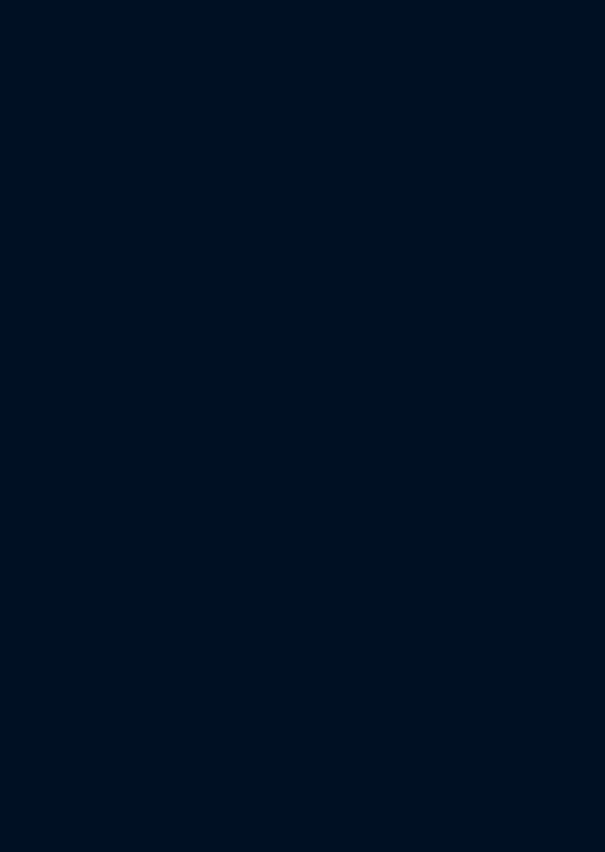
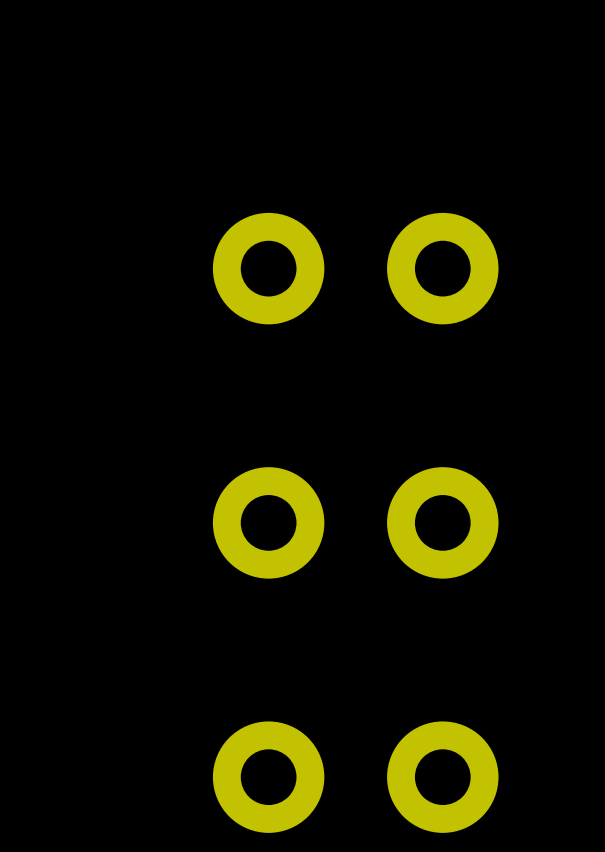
part: none -> (355, 268)
part: none -> (355, 522)
part: none -> (355, 777)

